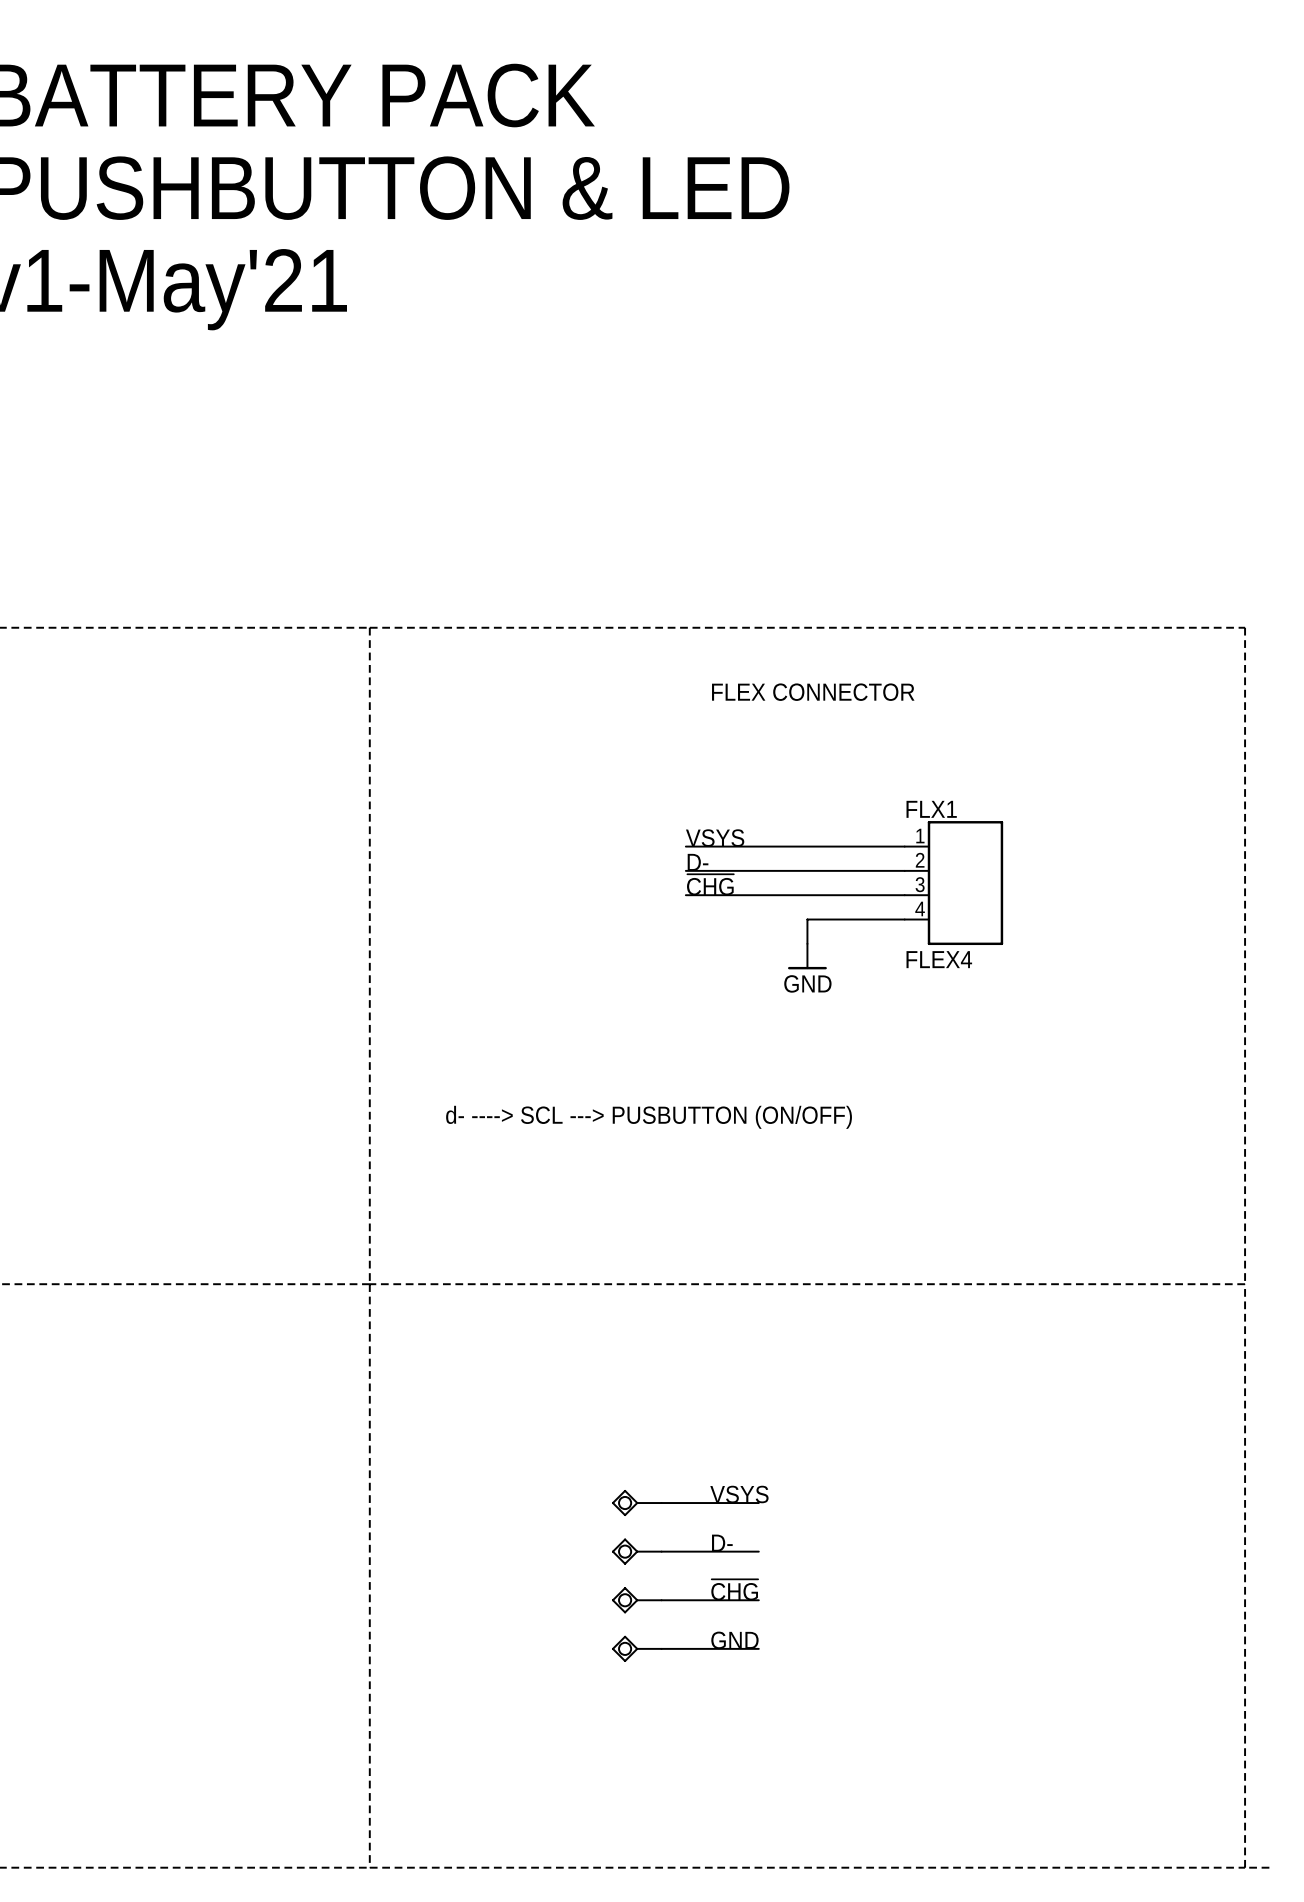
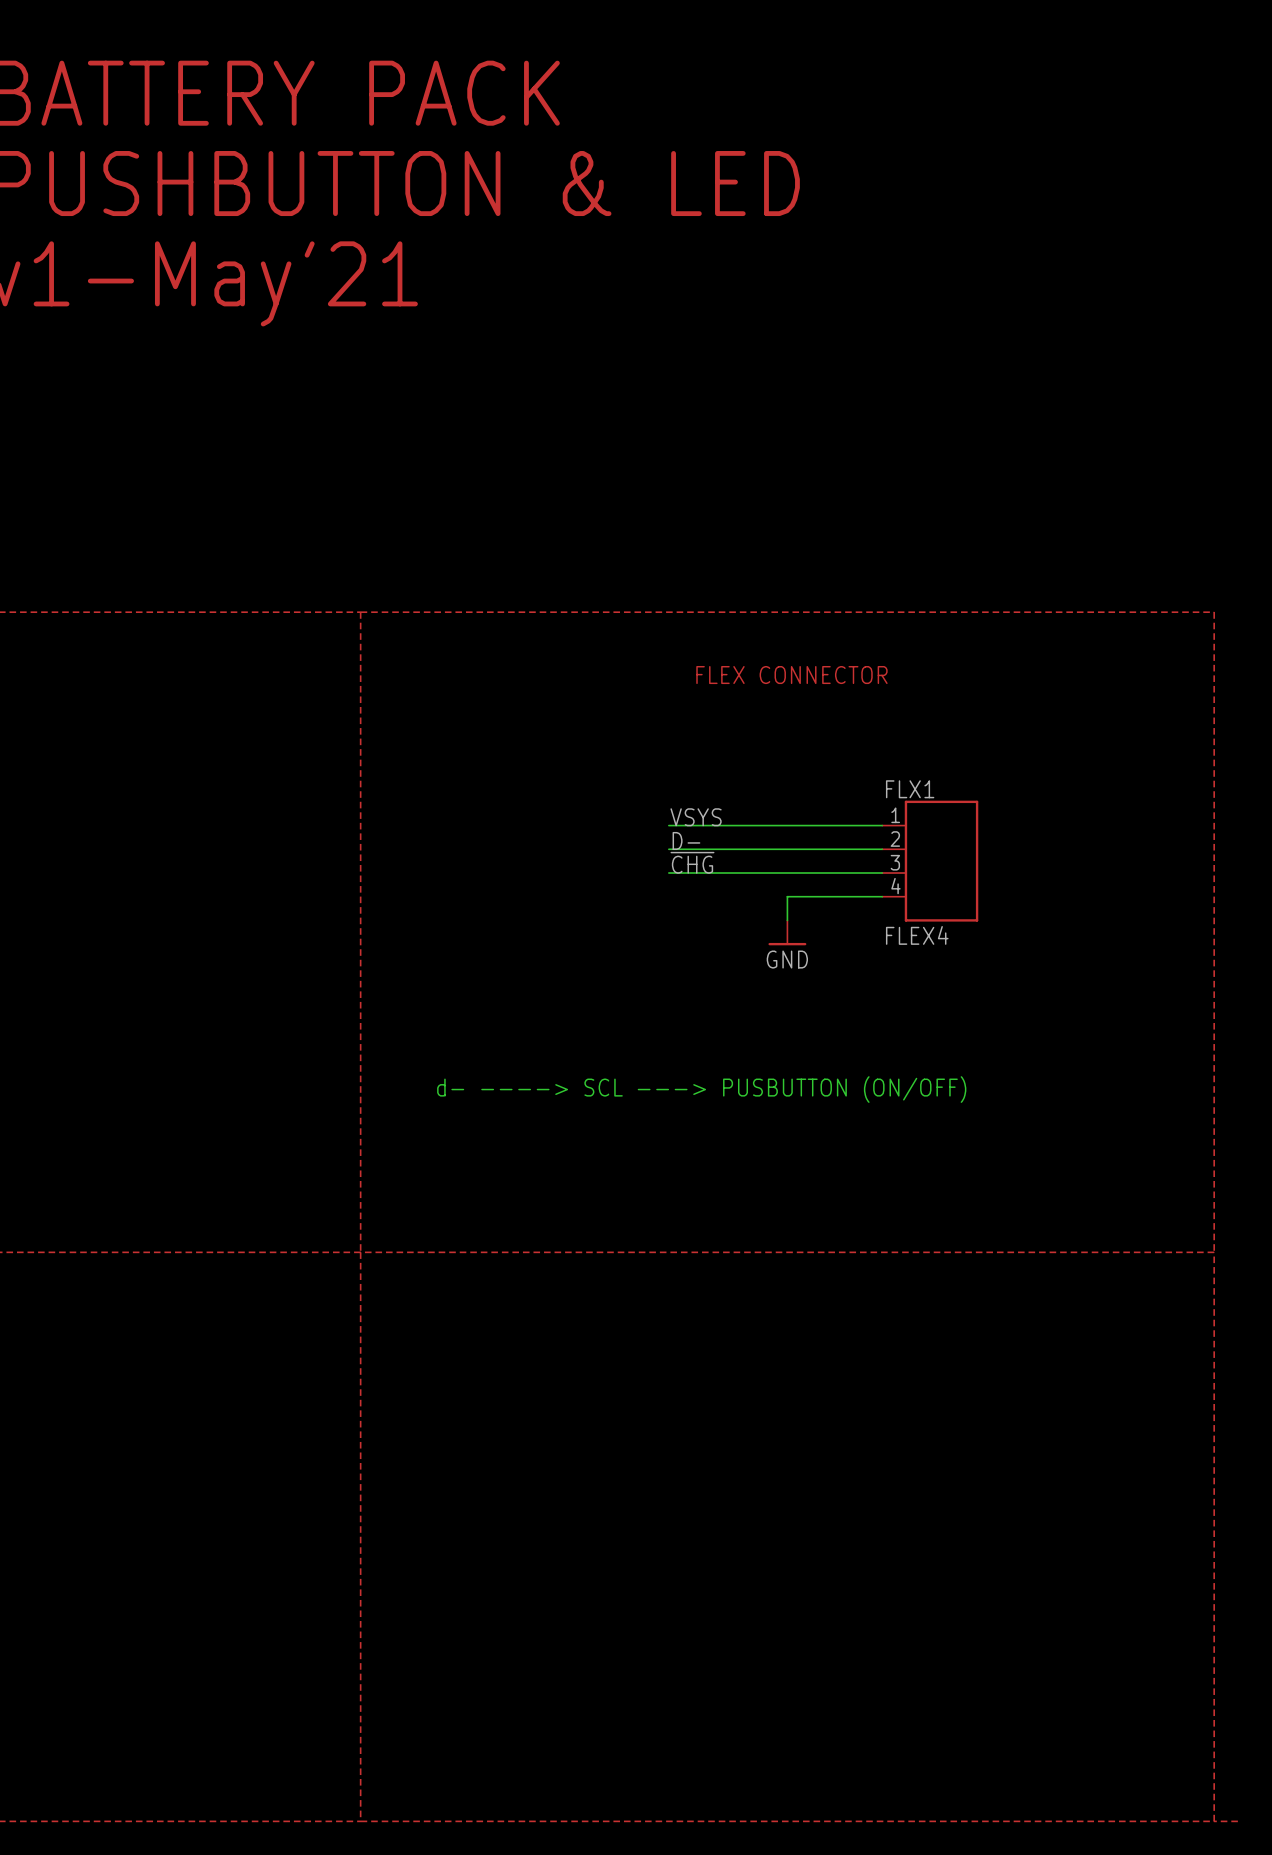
label: VSYS (739, 1494) -> none
part: (636, 1503) -> none
wire: (661, 1503) (758, 1503) -> none
label: D- (722, 1543) -> none
part: (636, 1551) -> none
wire: (661, 1551) (758, 1551) -> none
label: ~{CHG} (734, 1589) -> none
part: (636, 1600) -> none
wire: (661, 1600) (758, 1600) -> none
label: GND (734, 1640) -> none
part: (636, 1648) -> none
wire: (661, 1648) (758, 1648) -> none

